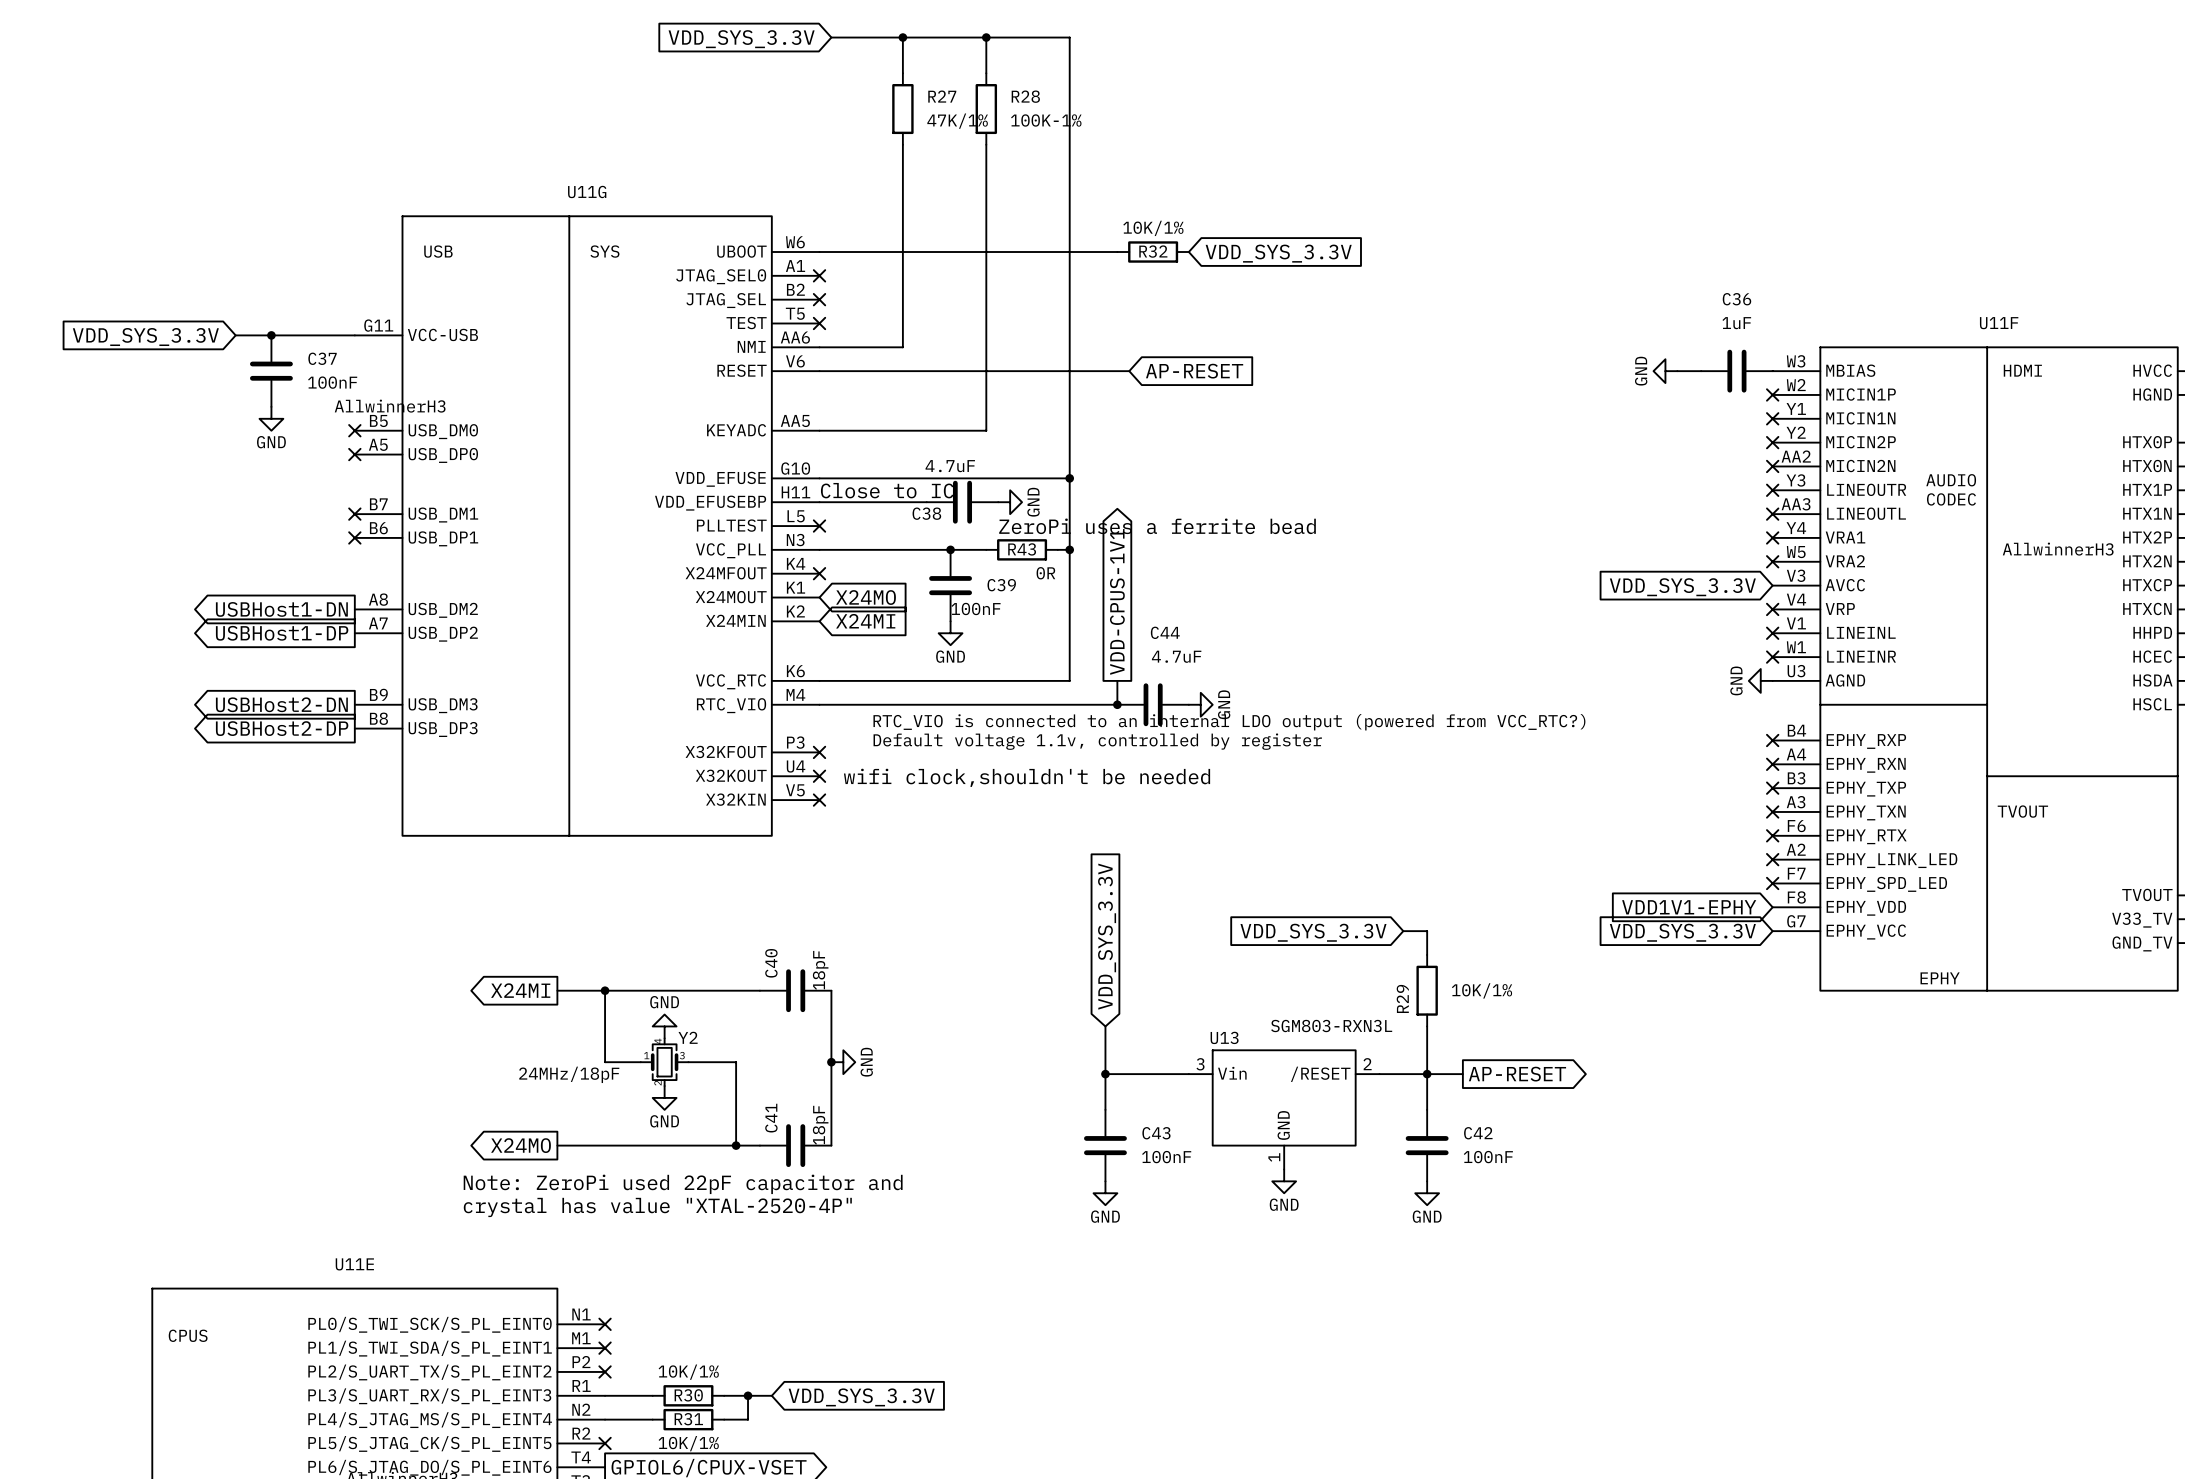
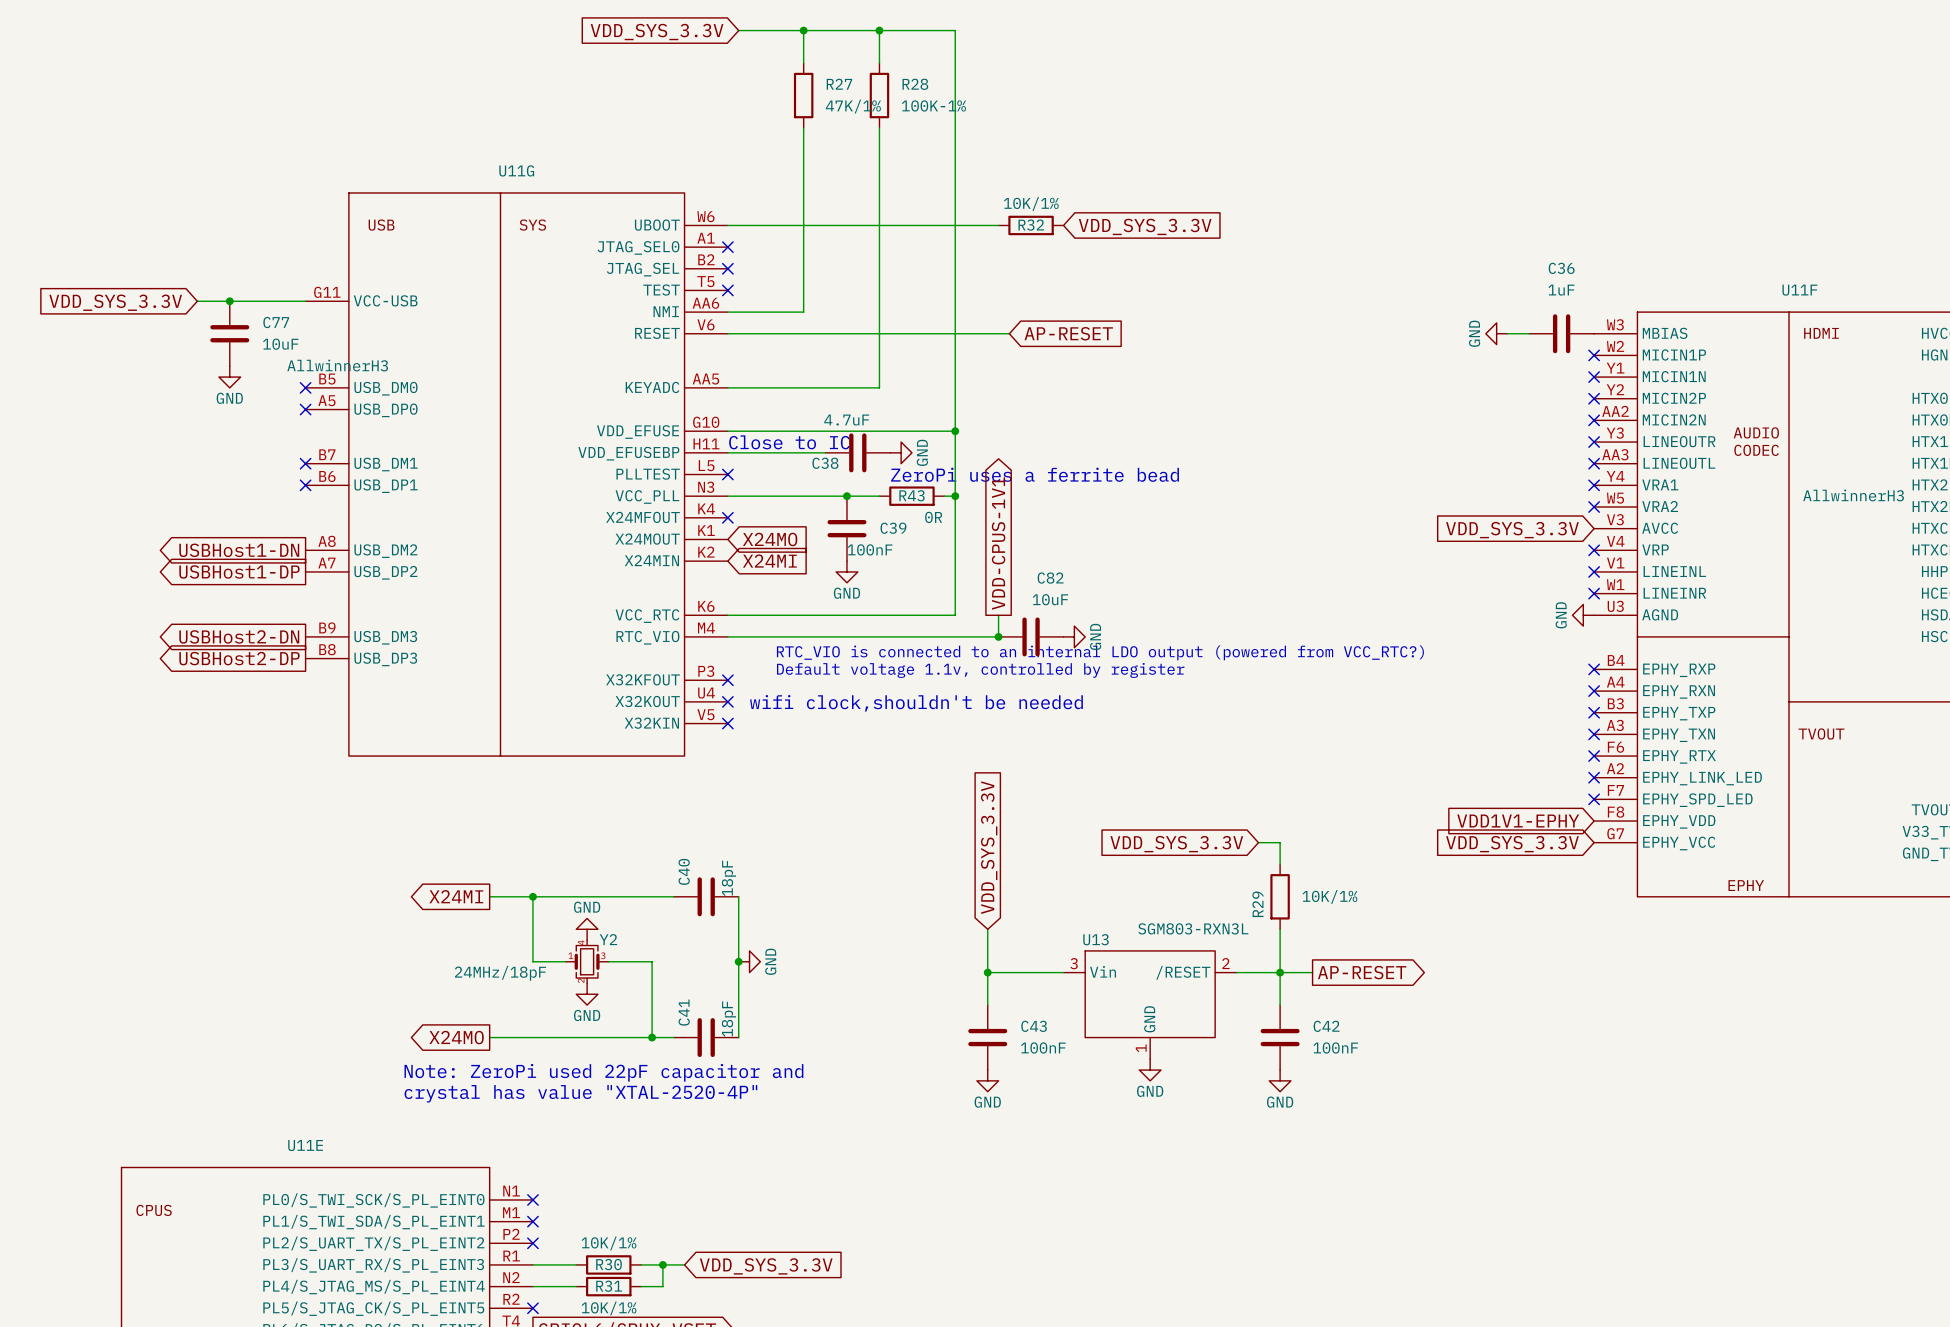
C37 name: C37 (322, 358) -> C77 (276, 322)
C37 value: 100nF (332, 382) -> 10uF (280, 344)
C44 name: C44 (1165, 632) -> C82 (1050, 578)
C44 value: 4.7uF (1176, 656) -> 10uF (1050, 599)

